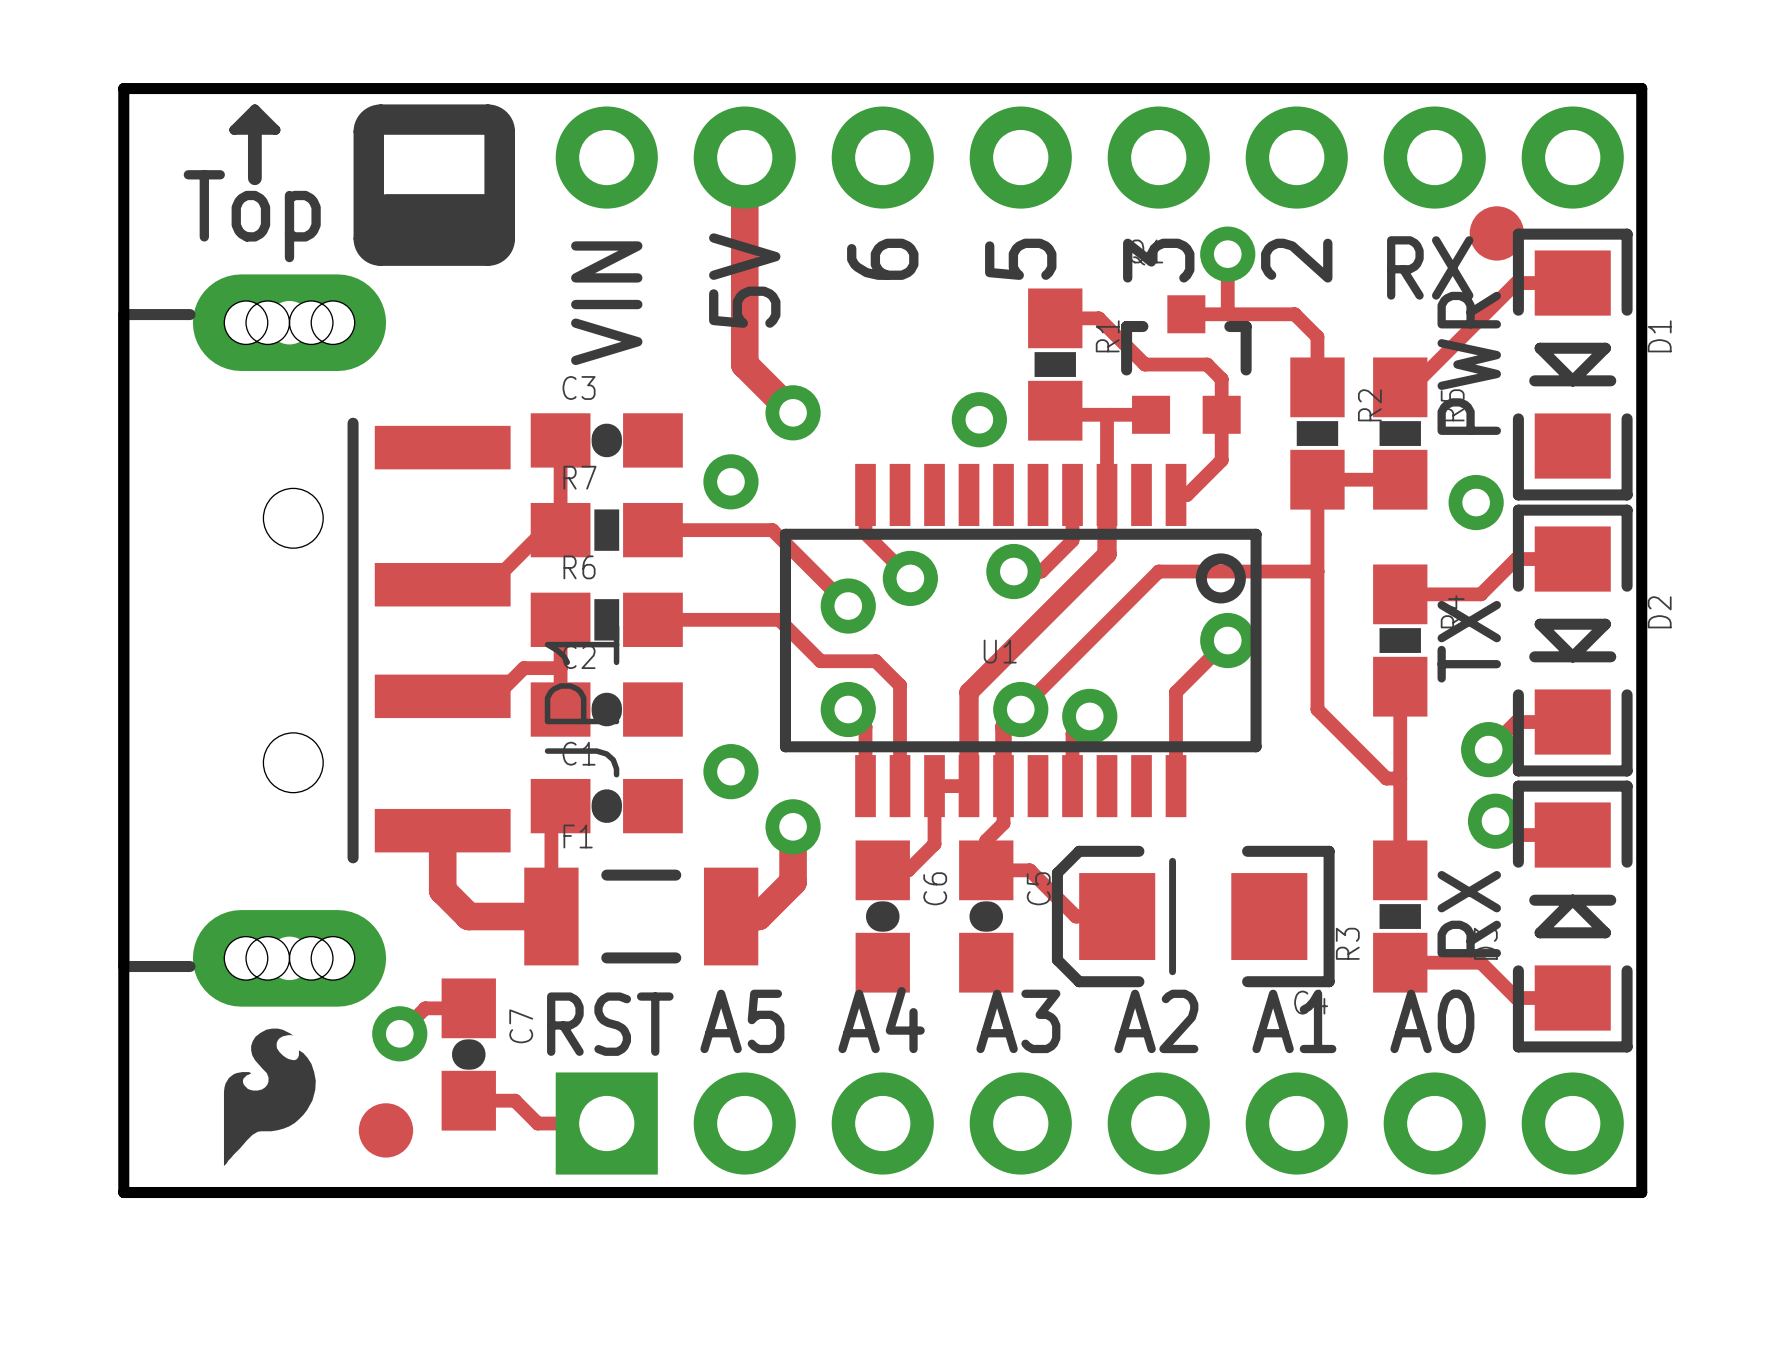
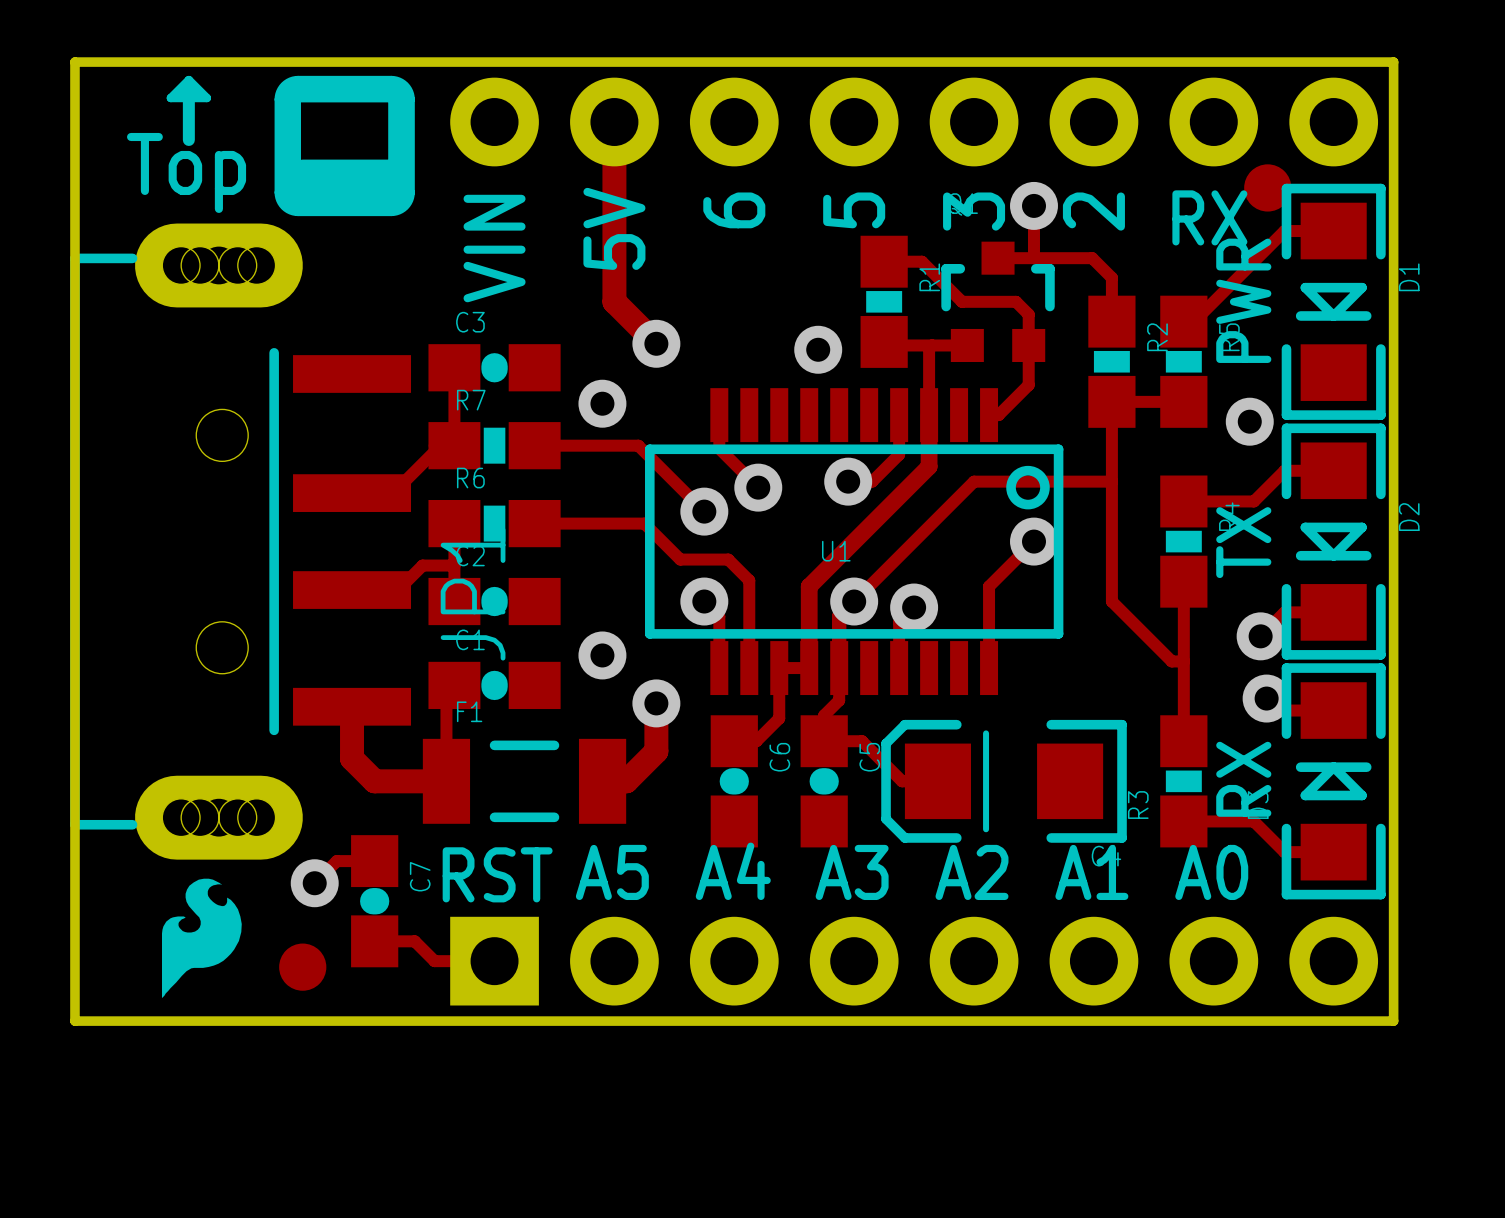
drawing shape: [360, 111, 509, 259] -> [280, 81, 409, 211]

